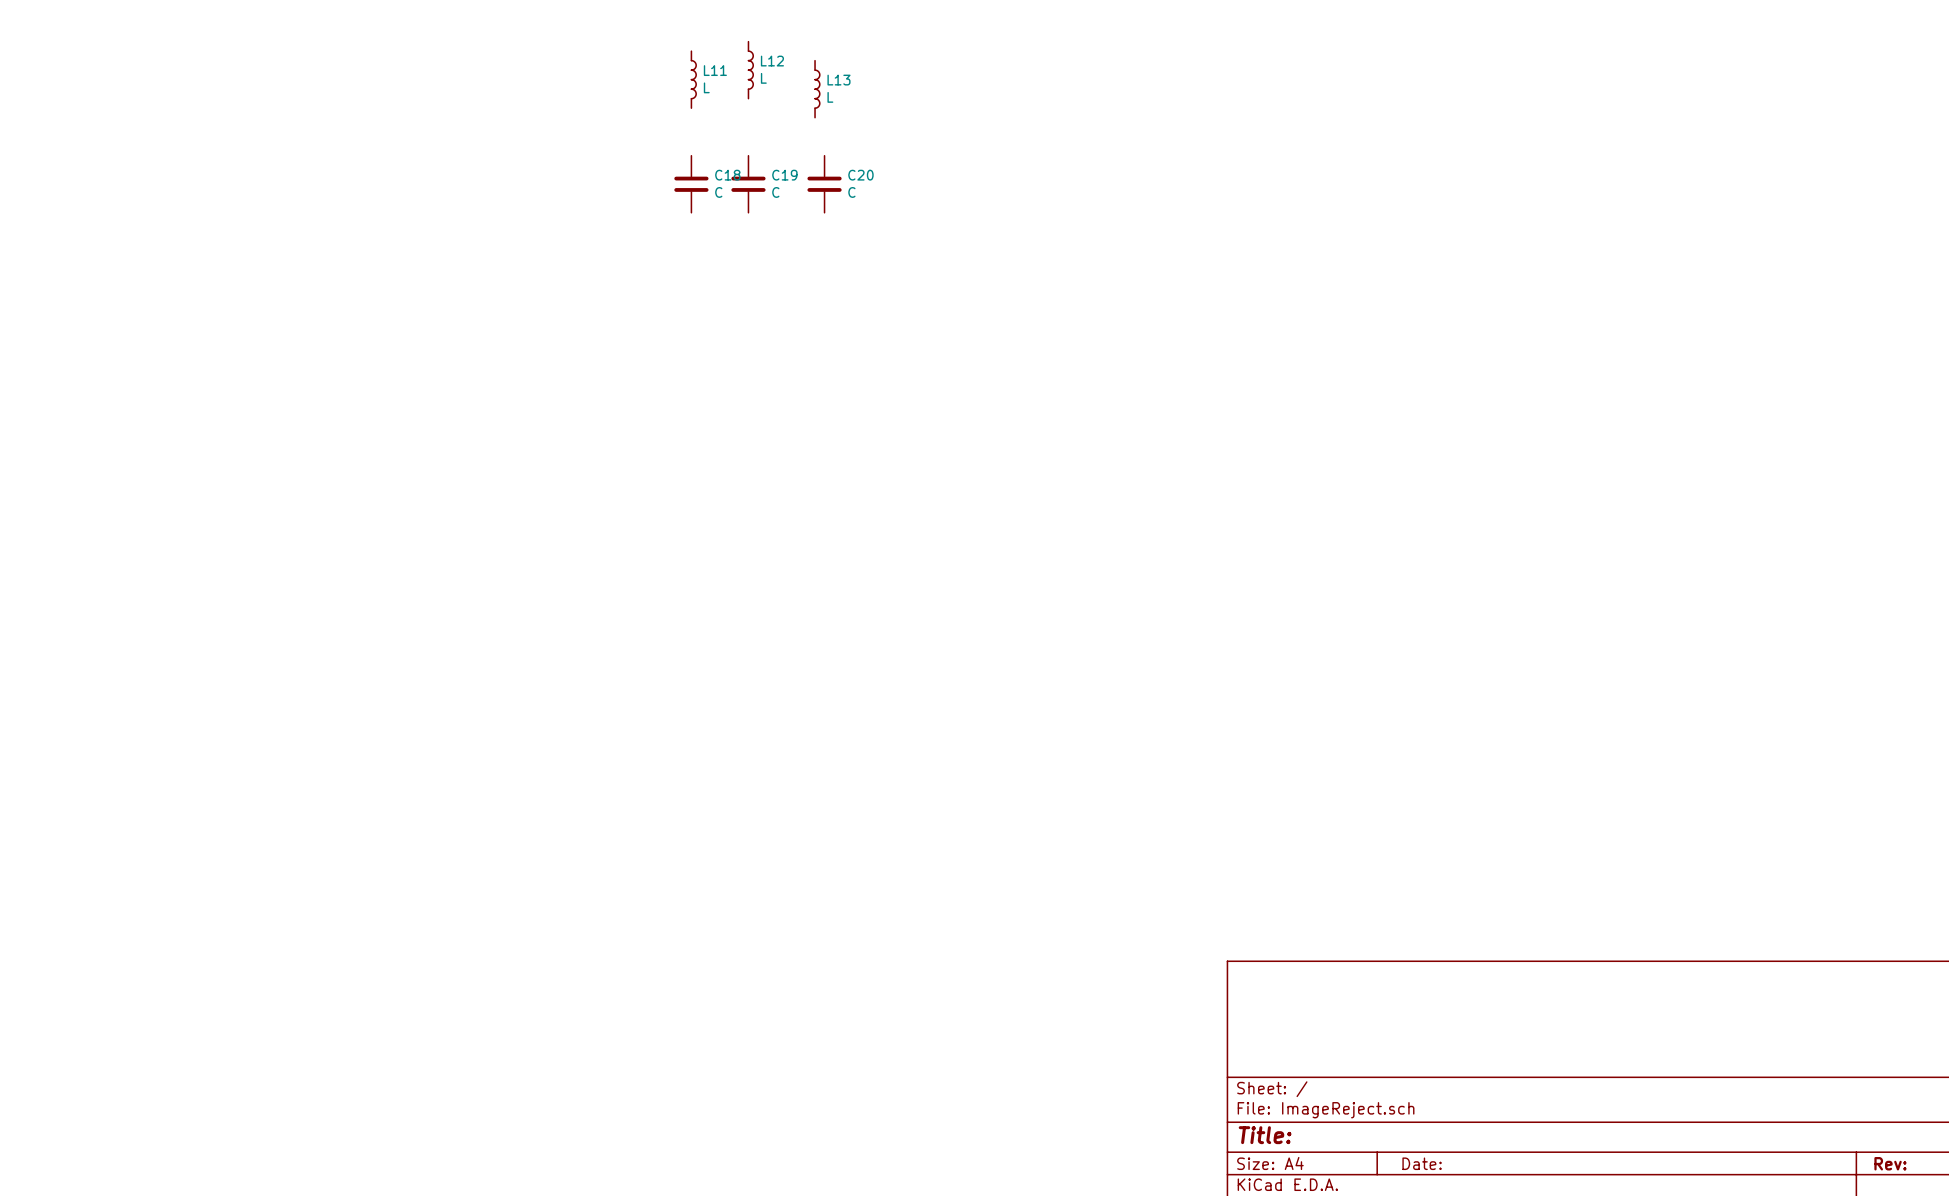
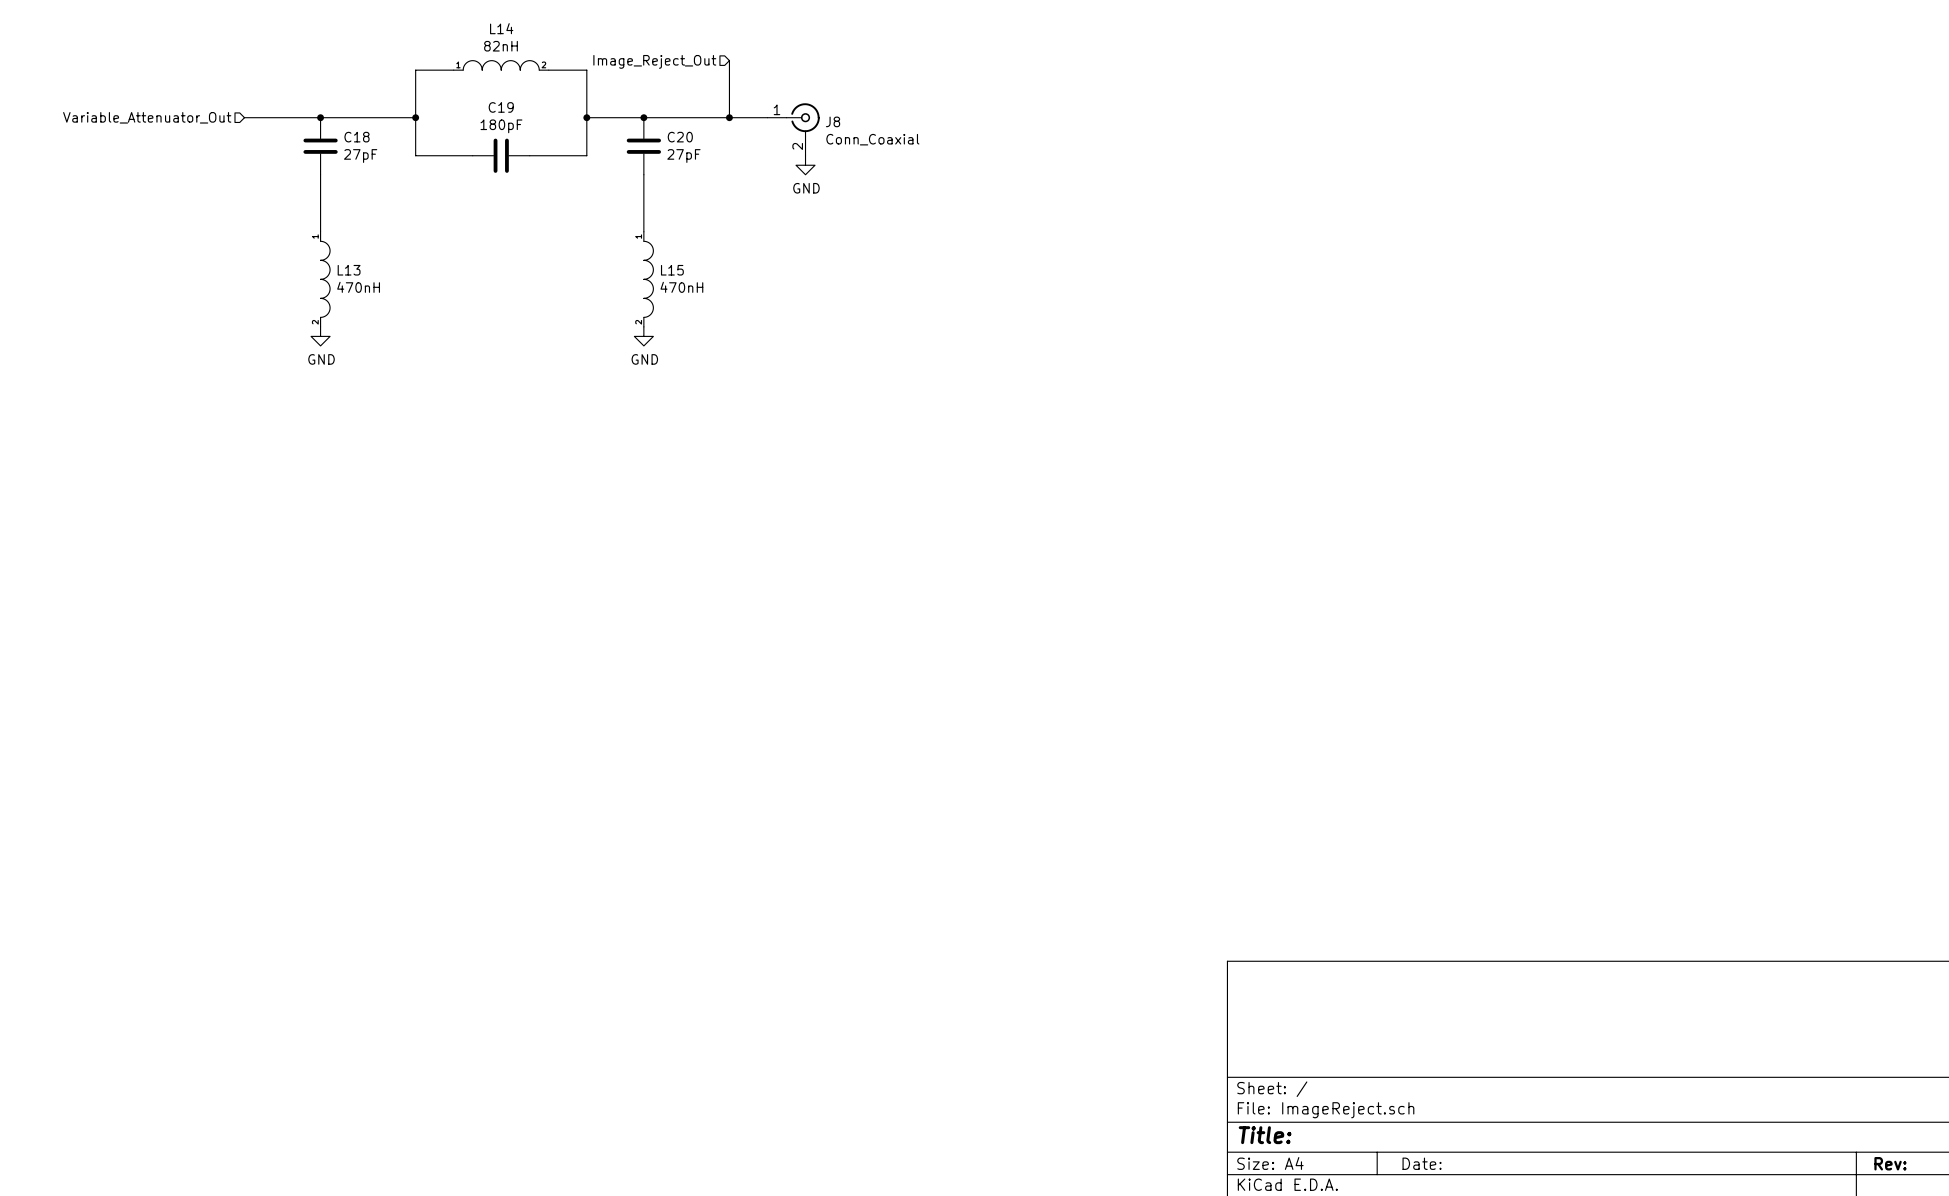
wire: none -> (729, 60) (729, 117)
L13 symbol: [815, 60, 820, 118] -> [320, 231, 331, 327]
hierarchical label: none -> Image_Reject_Out (654, 61)
L14: none -> 82nH (501, 65)
wire: none -> (453, 70) (415, 70) (415, 155) (472, 155)
wire: none -> (548, 70) (586, 70) (586, 155) (529, 155)
L12: L (750, 70) -> none
L11: L (693, 79) -> none
L13 value: L (830, 97) -> 470nH (358, 287)
hierarchical label: none -> Variable_Attenuator_Out (147, 117)
wire: none -> (244, 117) (415, 117)
junction: none -> (320, 117)
junction: none -> (415, 117)
wire: none -> (586, 117) (767, 117)
junction: none -> (586, 117)
junction: none -> (643, 117)
junction: none -> (729, 117)
J8: none -> Conn_Coaxial (793, 129)
power symbol: none -> GND (805, 165)
wire: none -> (320, 174) (320, 231)
wire: none -> (643, 174) (643, 231)
C19 name position: C19 (784, 175) -> C19 (501, 107)
C18 position: (691, 184) -> (320, 146)
C19 rotation: 0° (748, 184) -> 90° clockwise (501, 155)
C19 position: (748, 184) -> (501, 155)
C20 position: (824, 184) -> (643, 146)
C18 value: C (718, 192) -> 27pF (360, 156)
C19 value: C (775, 192) -> 180pF (501, 126)
C20 value: C (851, 192) -> 27pF (683, 156)
L15: none -> 470nH (648, 279)
power symbol: none -> GND (320, 336)
power symbol: none -> GND (643, 336)

